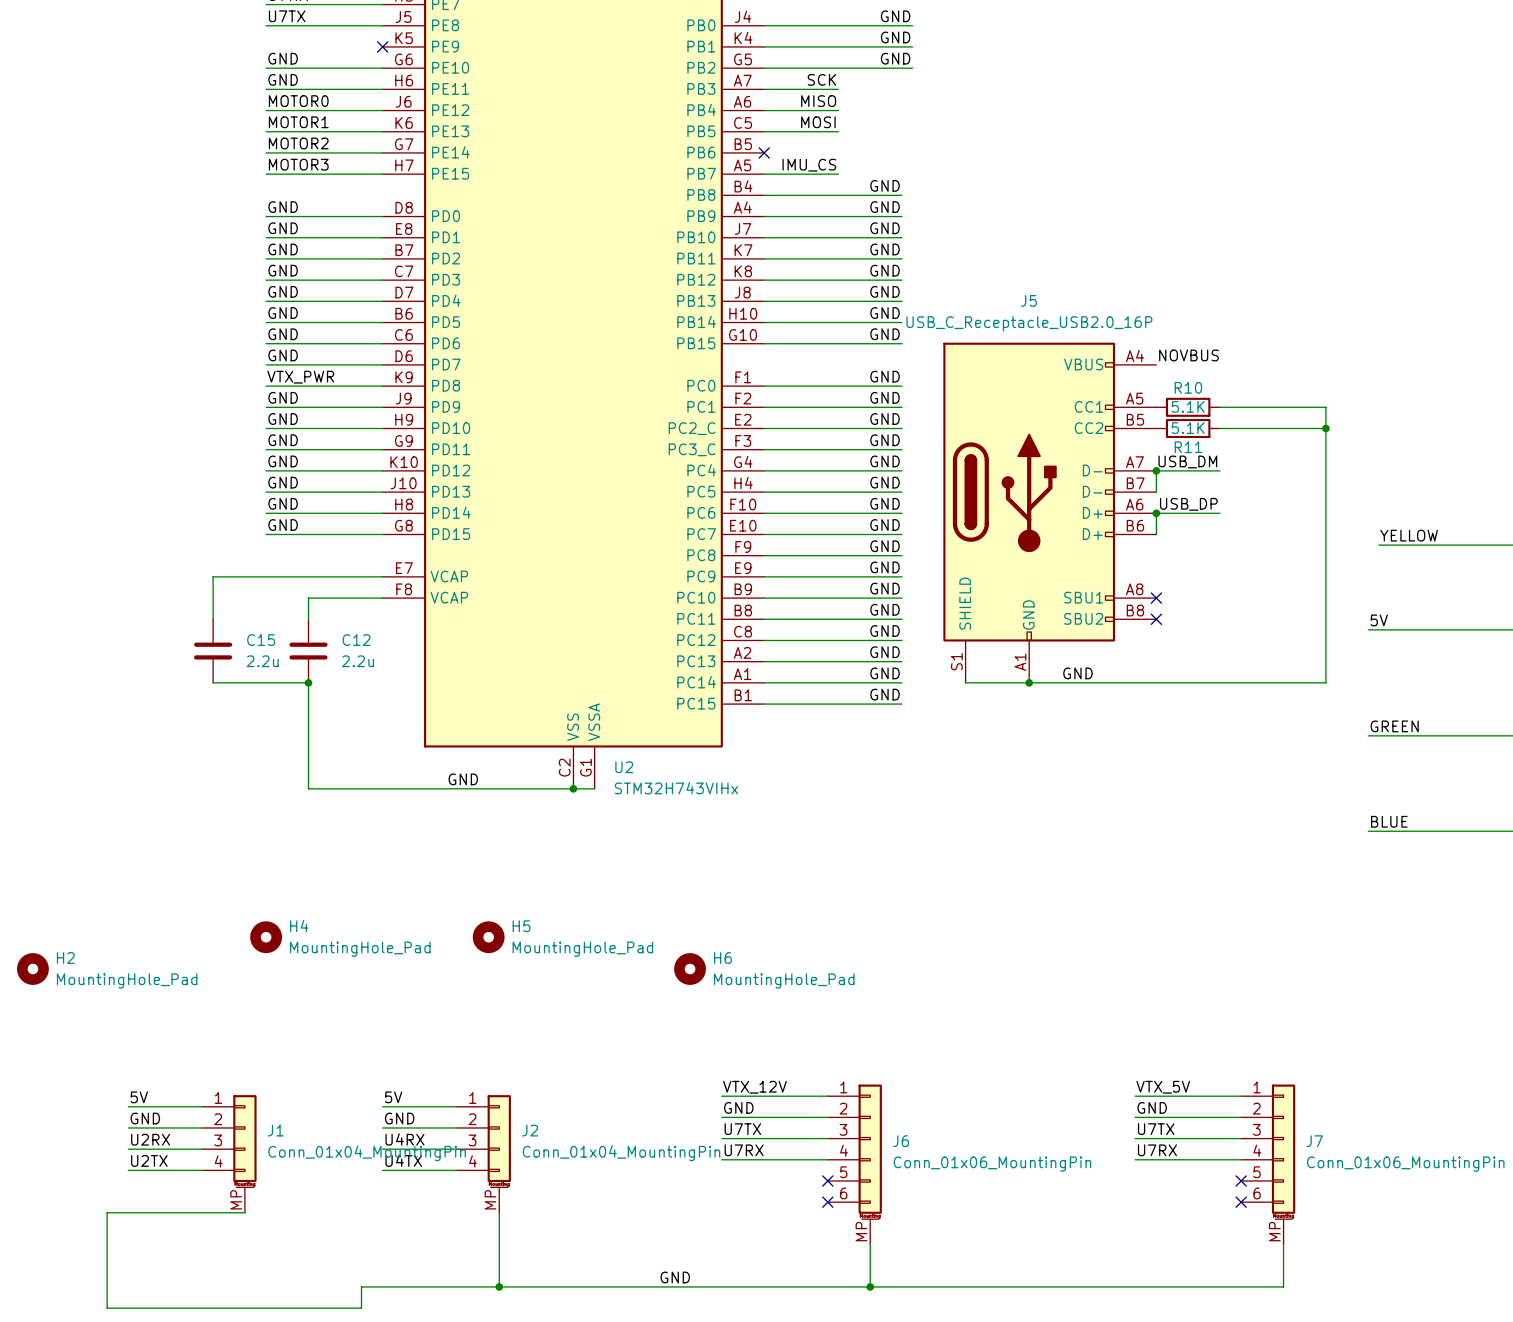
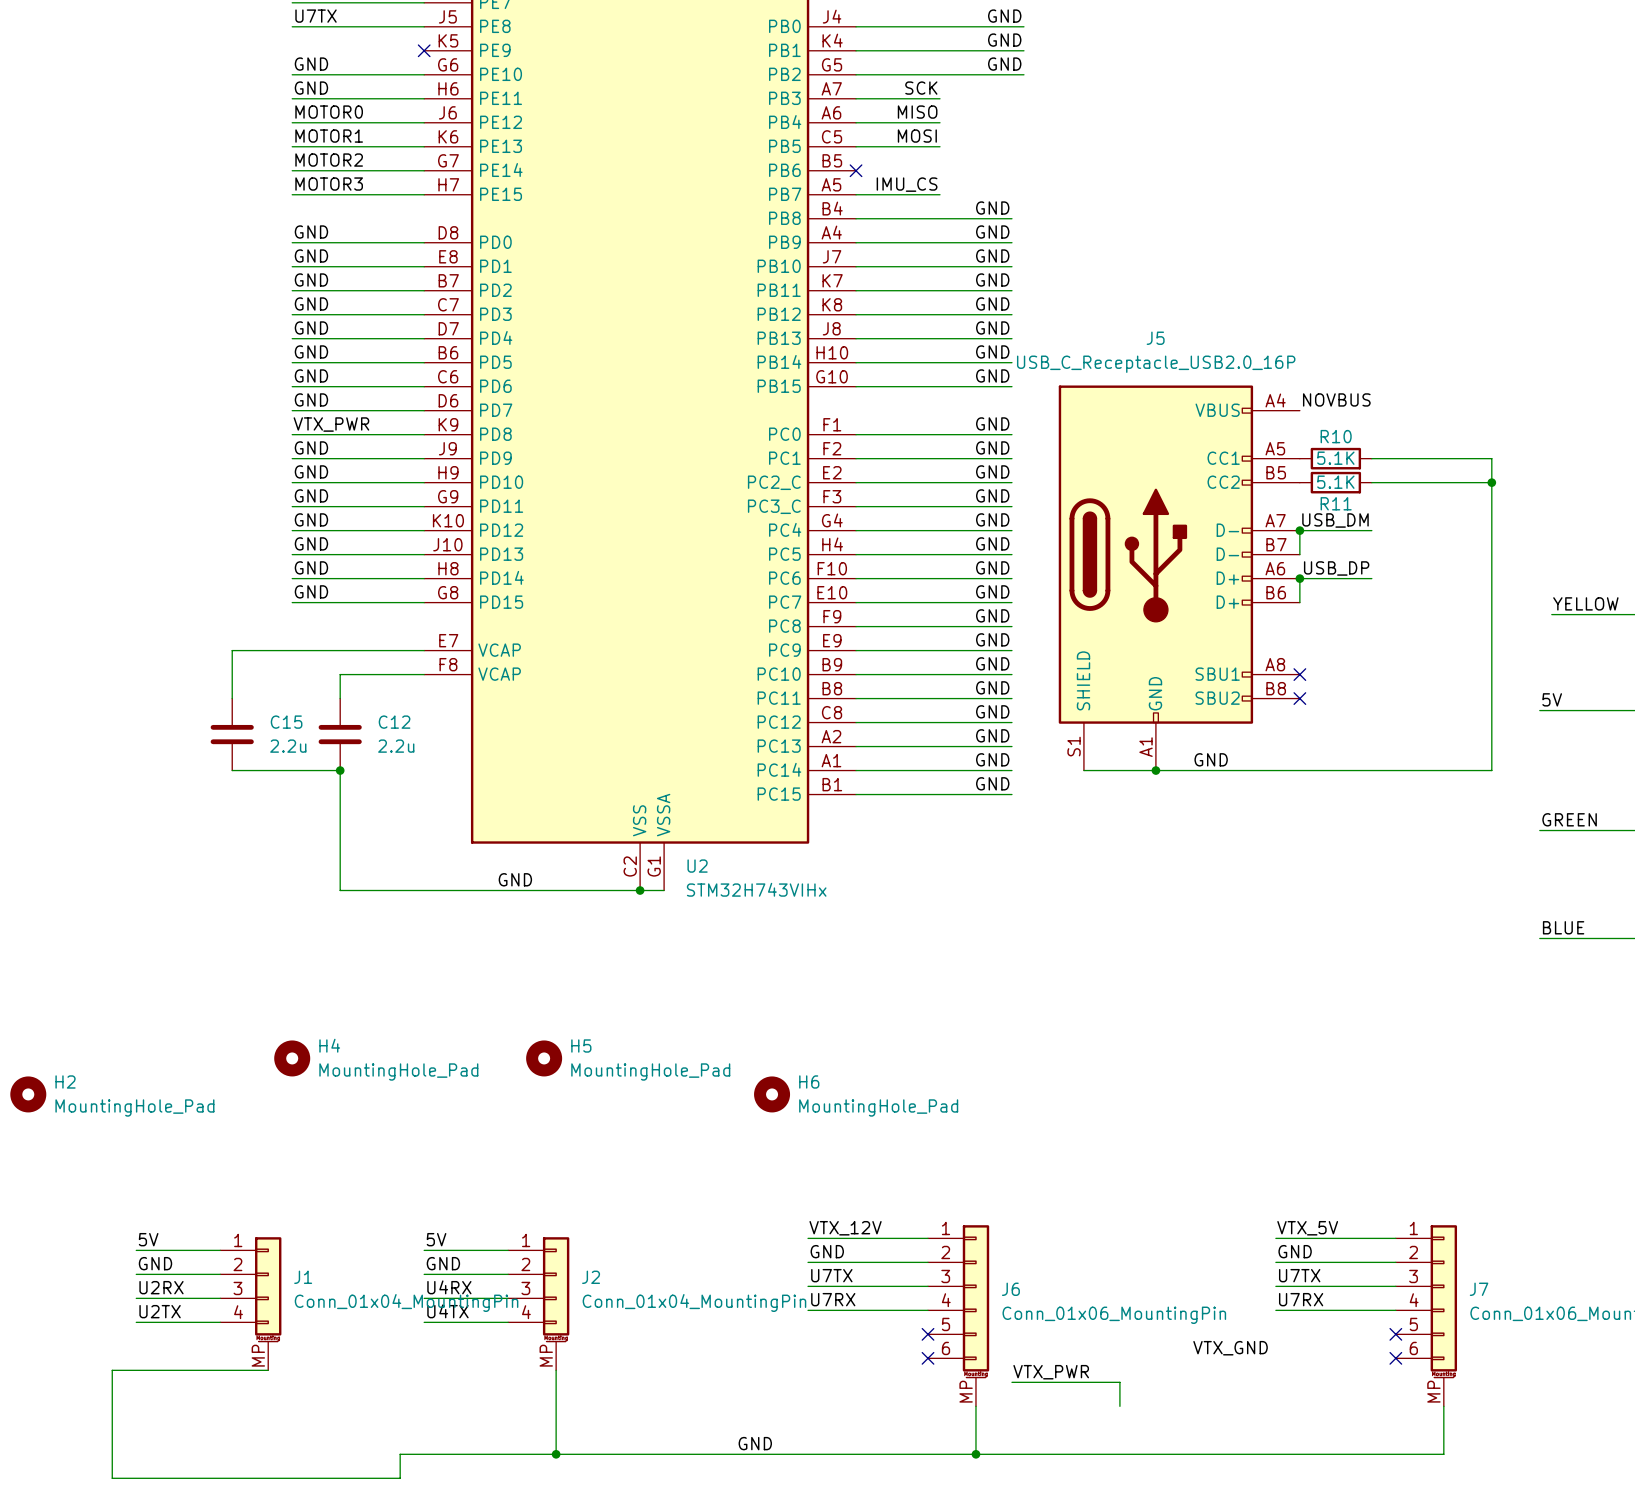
label: none -> VTX_GND (1230, 1348)
label: none -> VTX_PWR (1051, 1372)
wire: none -> (1011, 1382) (1119, 1382) (1119, 1406)

